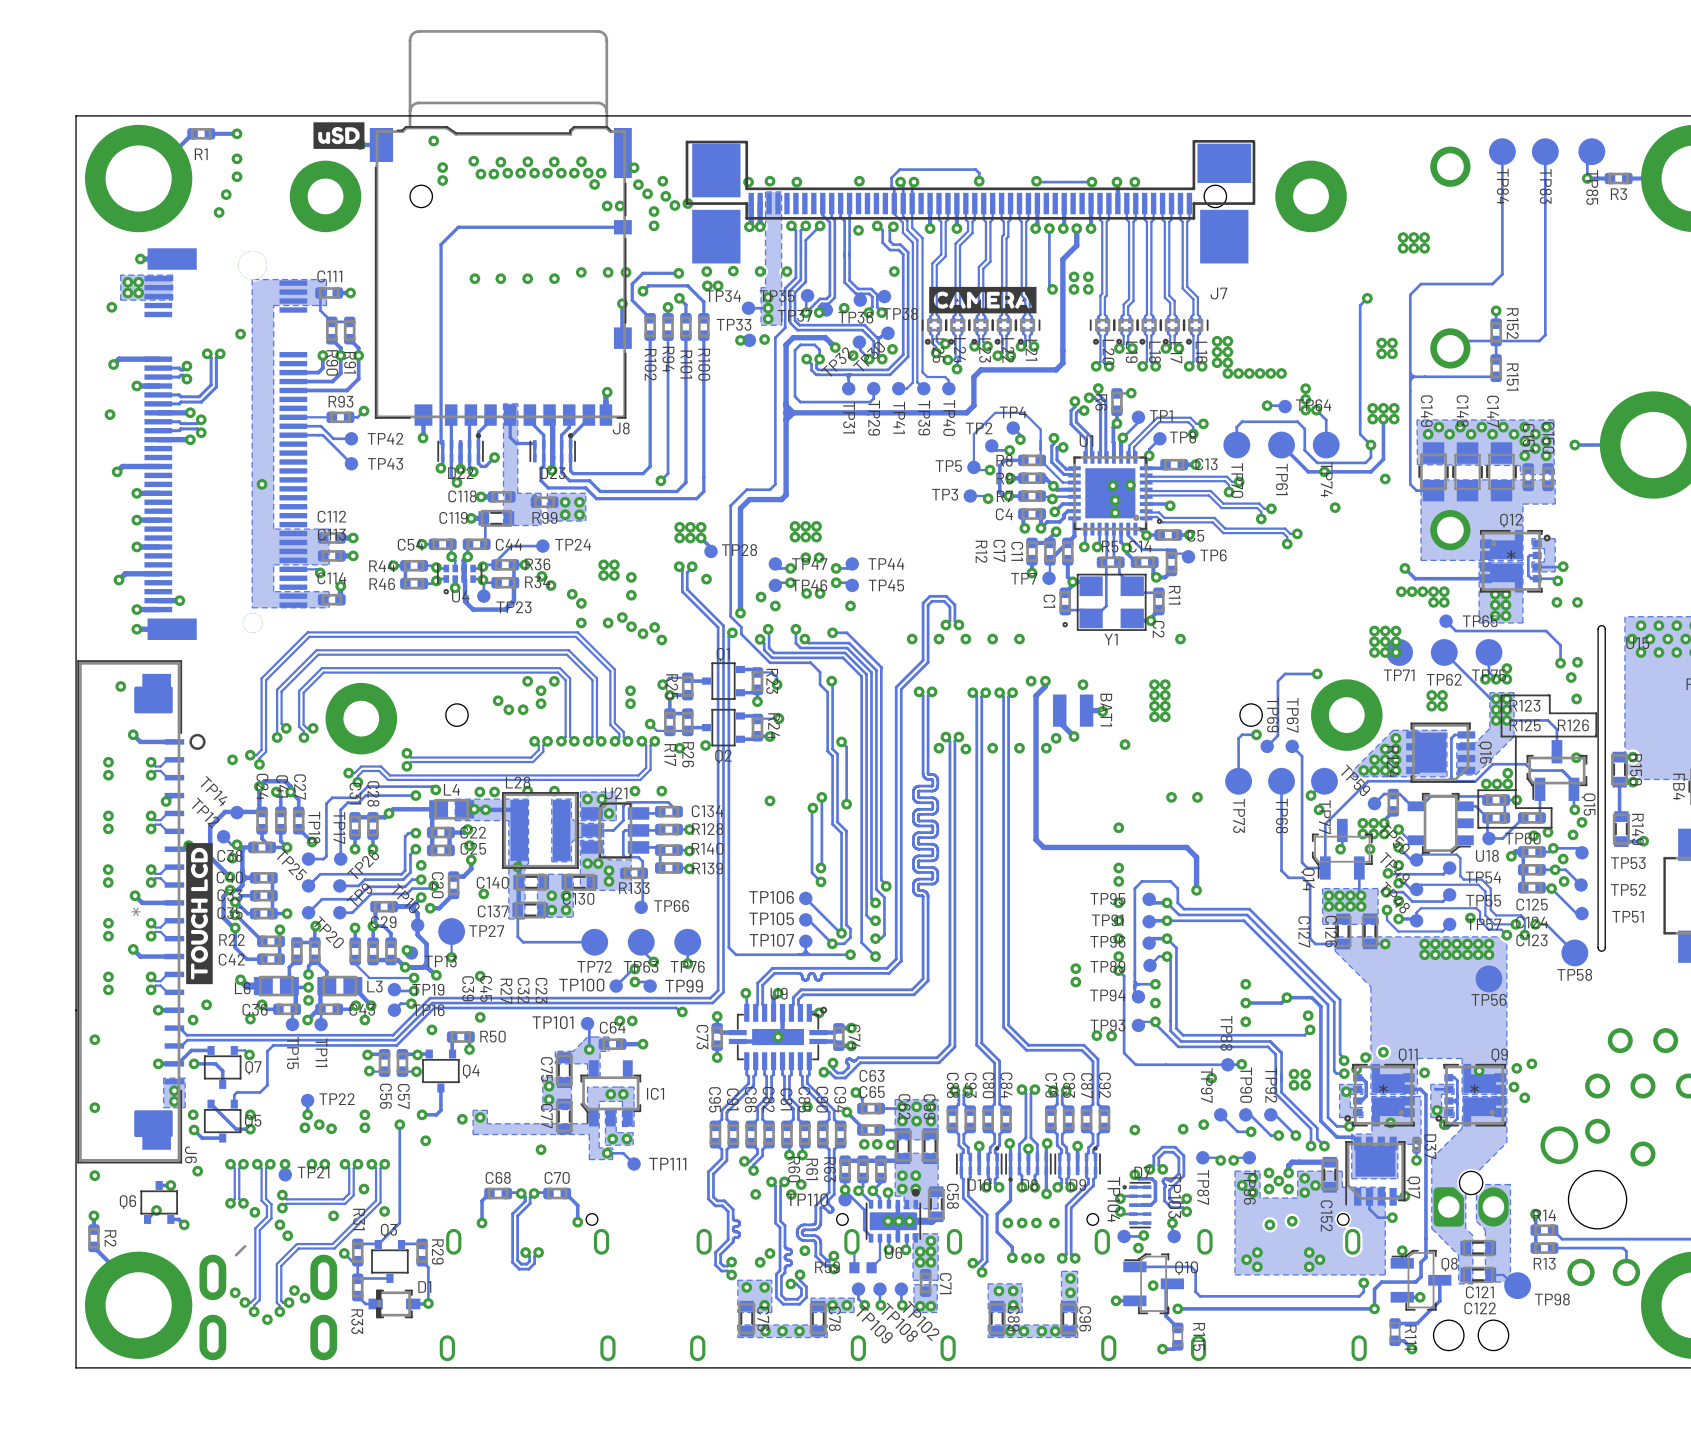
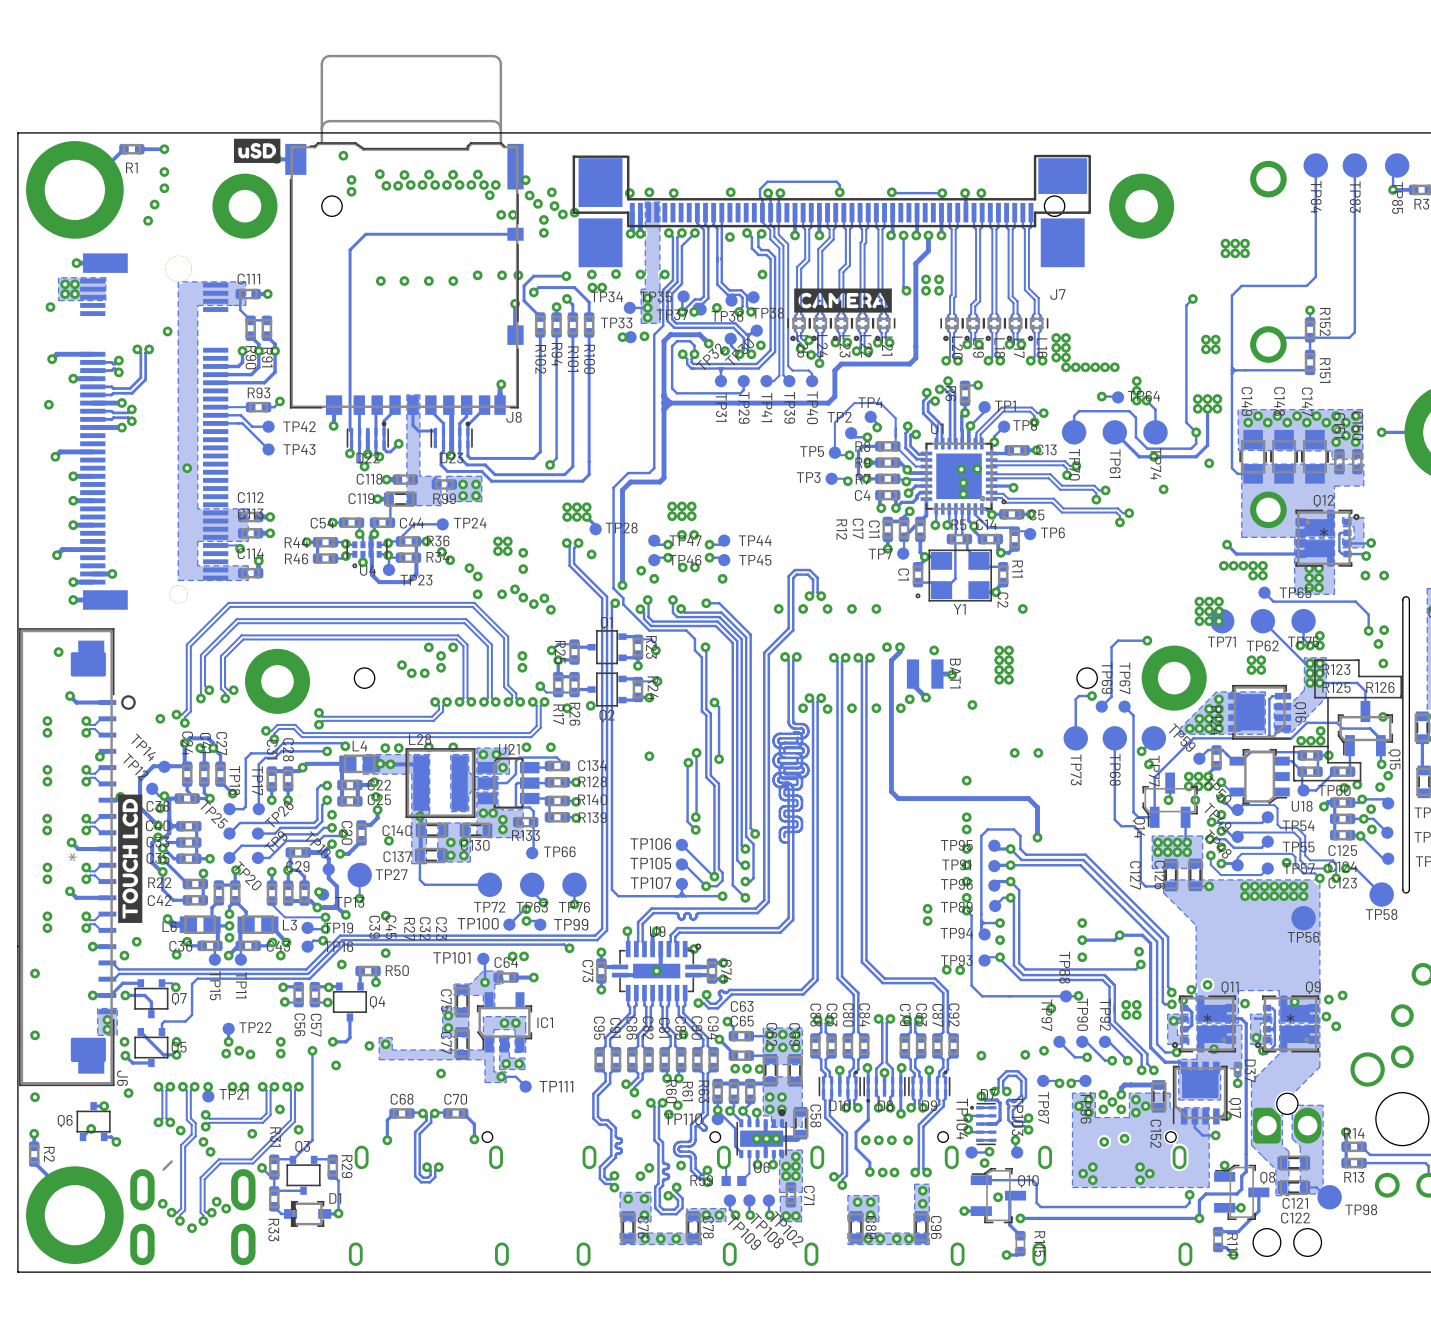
track: (928, 762) (928, 773) -> (793, 721) (794, 723) (806, 726) (806, 735) (801, 738) (780, 738) (778, 740) (780, 743) (805, 745) (808, 750) (806, 755) (796, 757)
track: (923, 763) (923, 776) (931, 779) -> (788, 721) (791, 727) (802, 728) (803, 732) (778, 733) (774, 737) (773, 742) (778, 747) (803, 749) (802, 753) (796, 753)
track: none -> (785, 753) (775, 755) (773, 760) (776, 766) (801, 767) (803, 770) (801, 772) (778, 773) (773, 778) (776, 785) (788, 789) (788, 843)
track: (919, 890) (925, 891) (928, 896) -> (785, 757) (779, 758) (778, 761) (803, 763) (808, 769) (806, 774) (803, 777) (780, 777) (778, 779) (780, 782) (789, 783) (793, 787) (793, 843)

